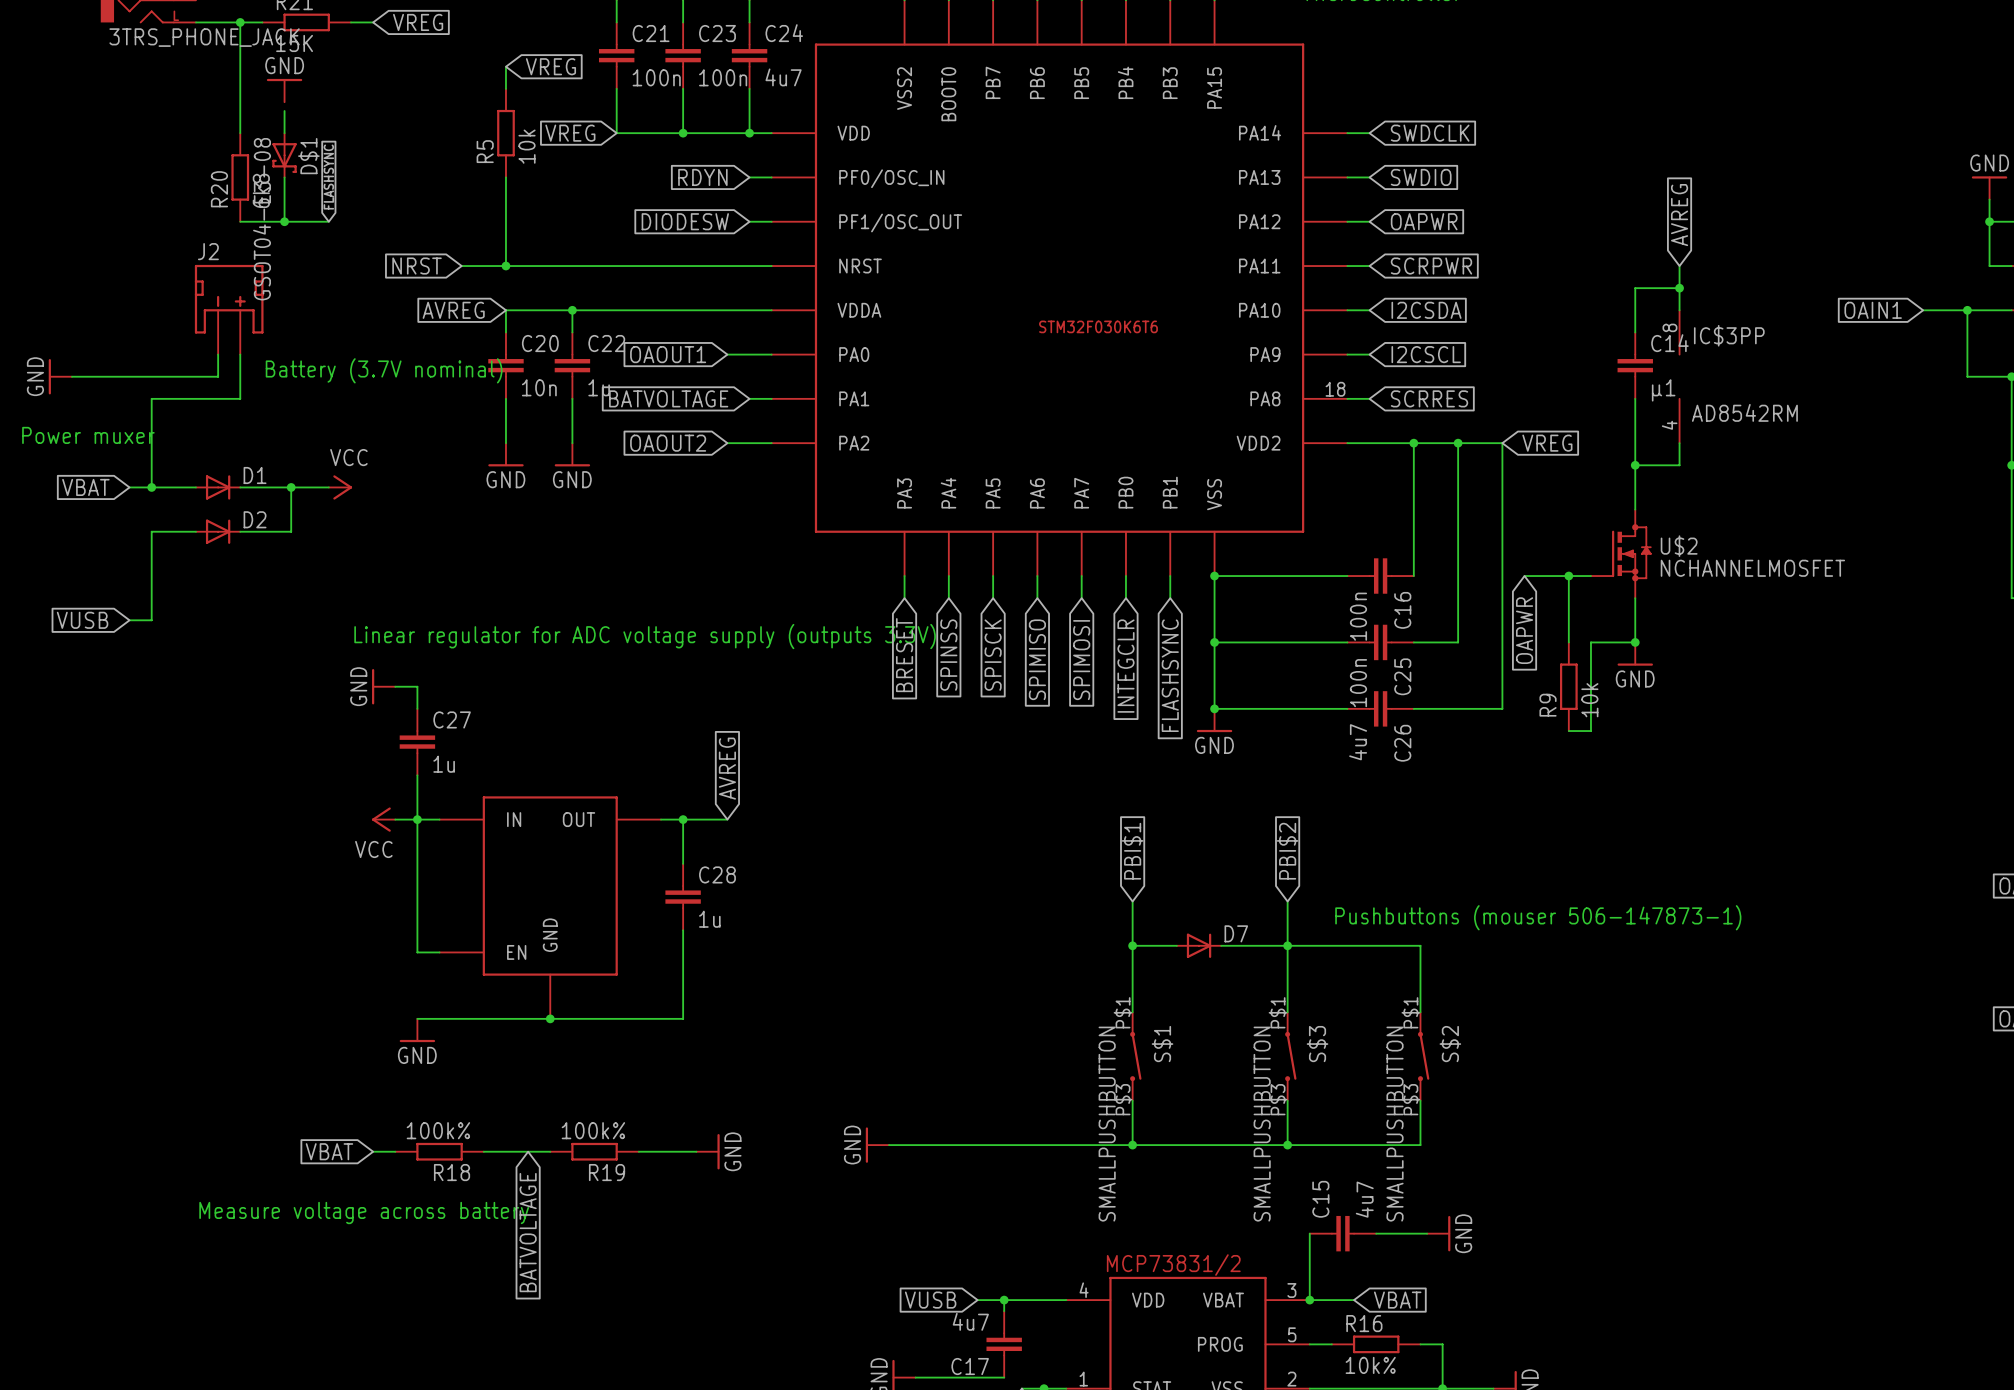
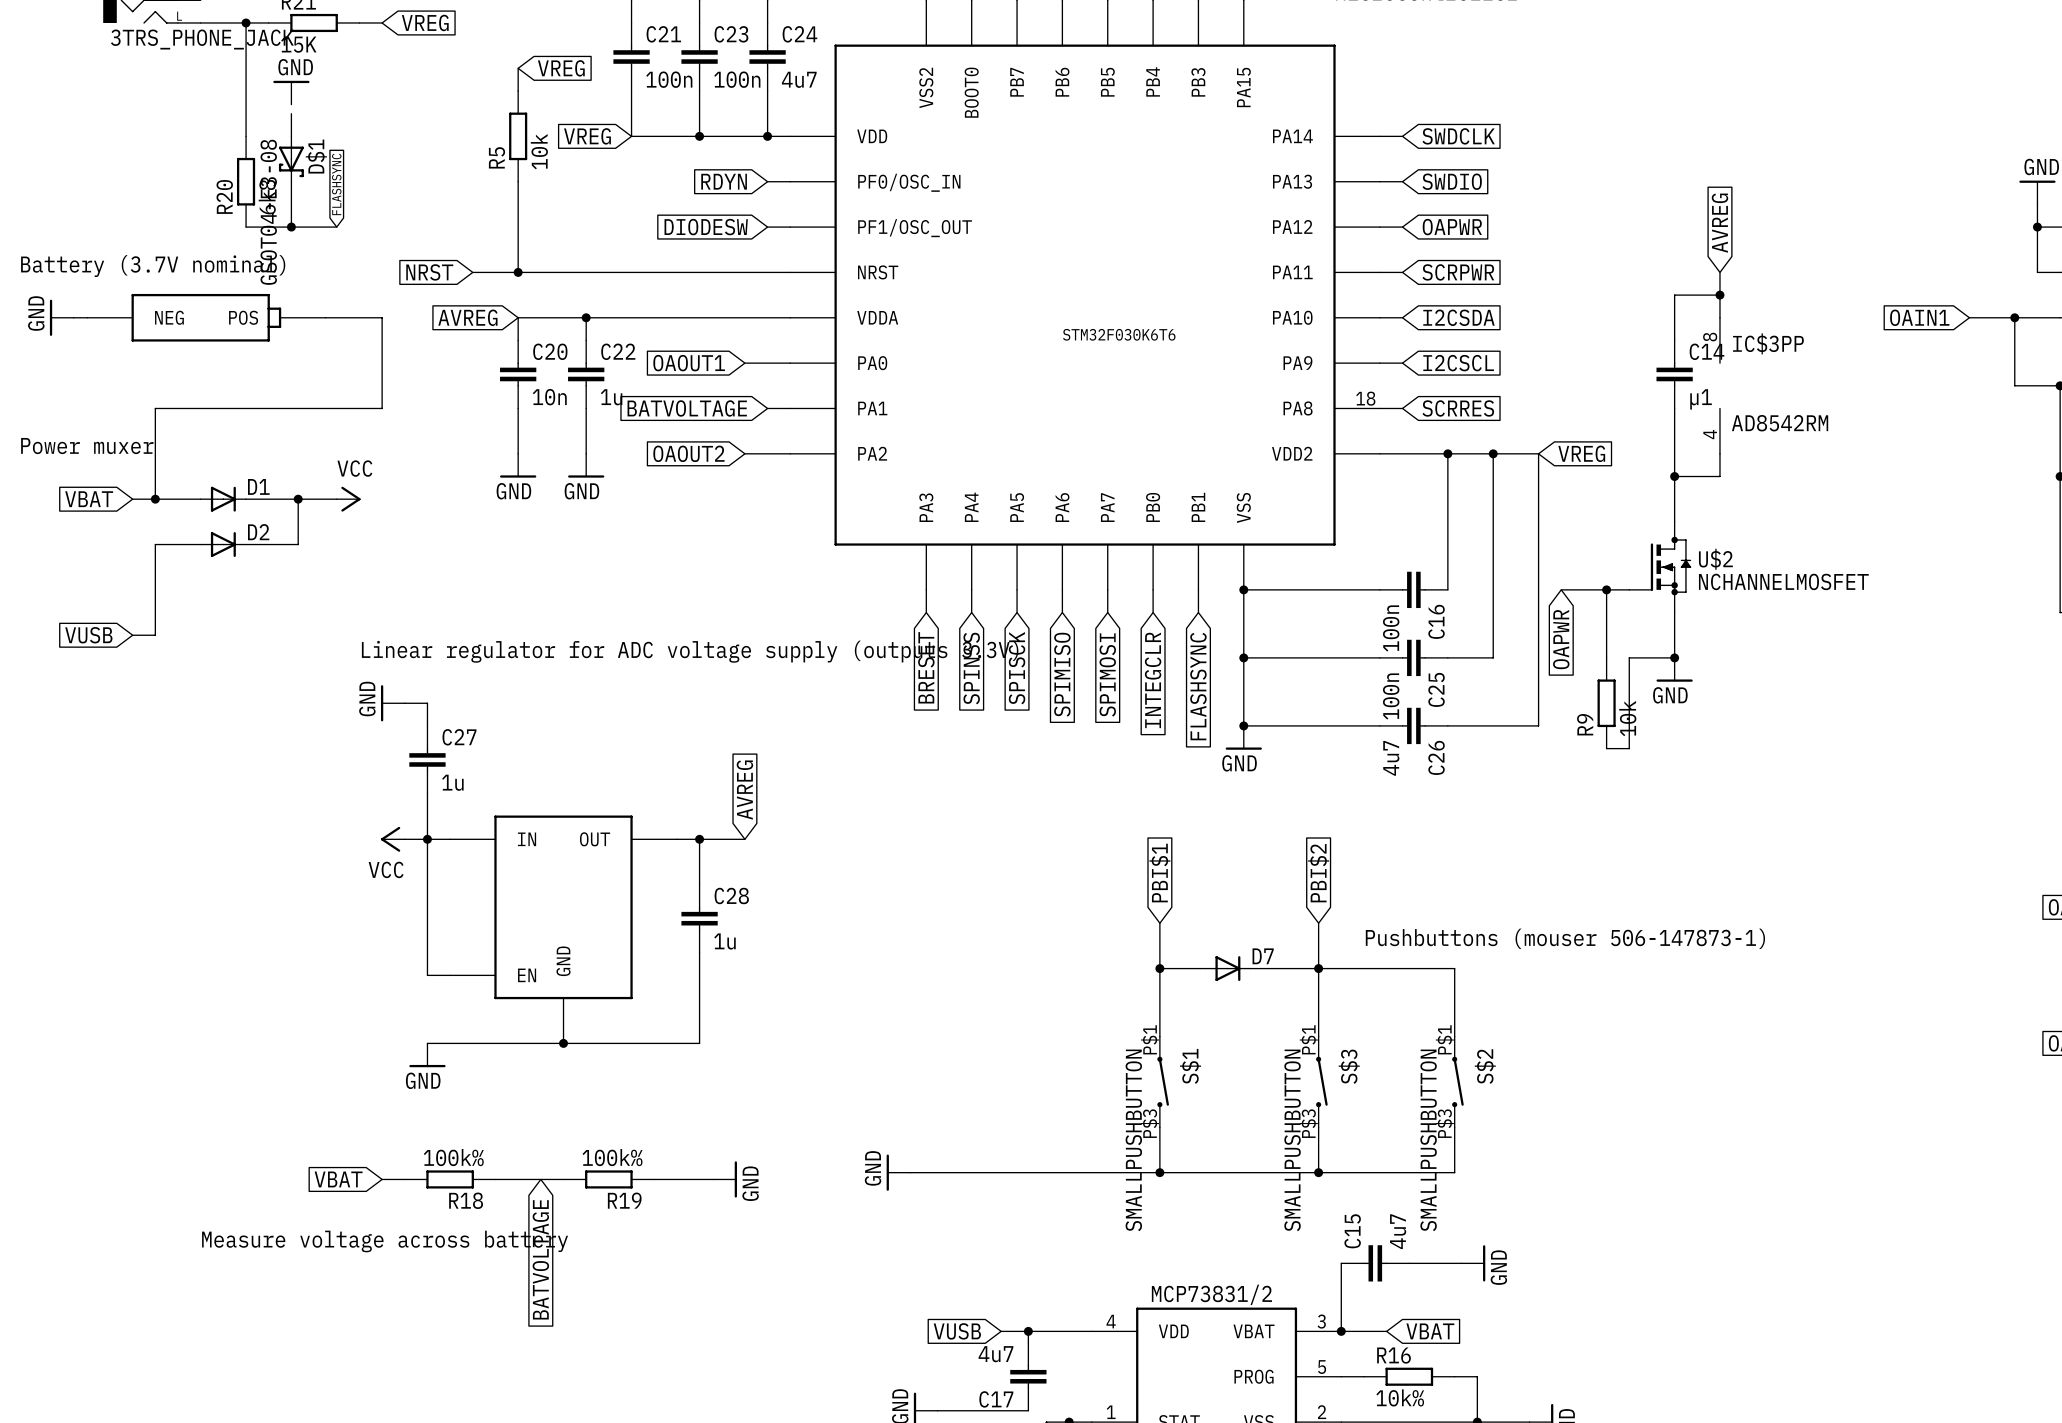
text: none -> Battery (3.7V nominal) (153, 266)
J2: (229, 309) -> none
wire: none -> (73, 317) (87, 317)
part: none -> (206, 317)
wire: (218, 354) (218, 376) (71, 376) -> none
wire: (240, 354) (240, 398) -> (325, 317) (382, 317) (382, 408) (246, 408)
text: Battery (3.7V nominal) (384, 370) -> none
power symbol position: GND (60, 376) -> GND (61, 317)

